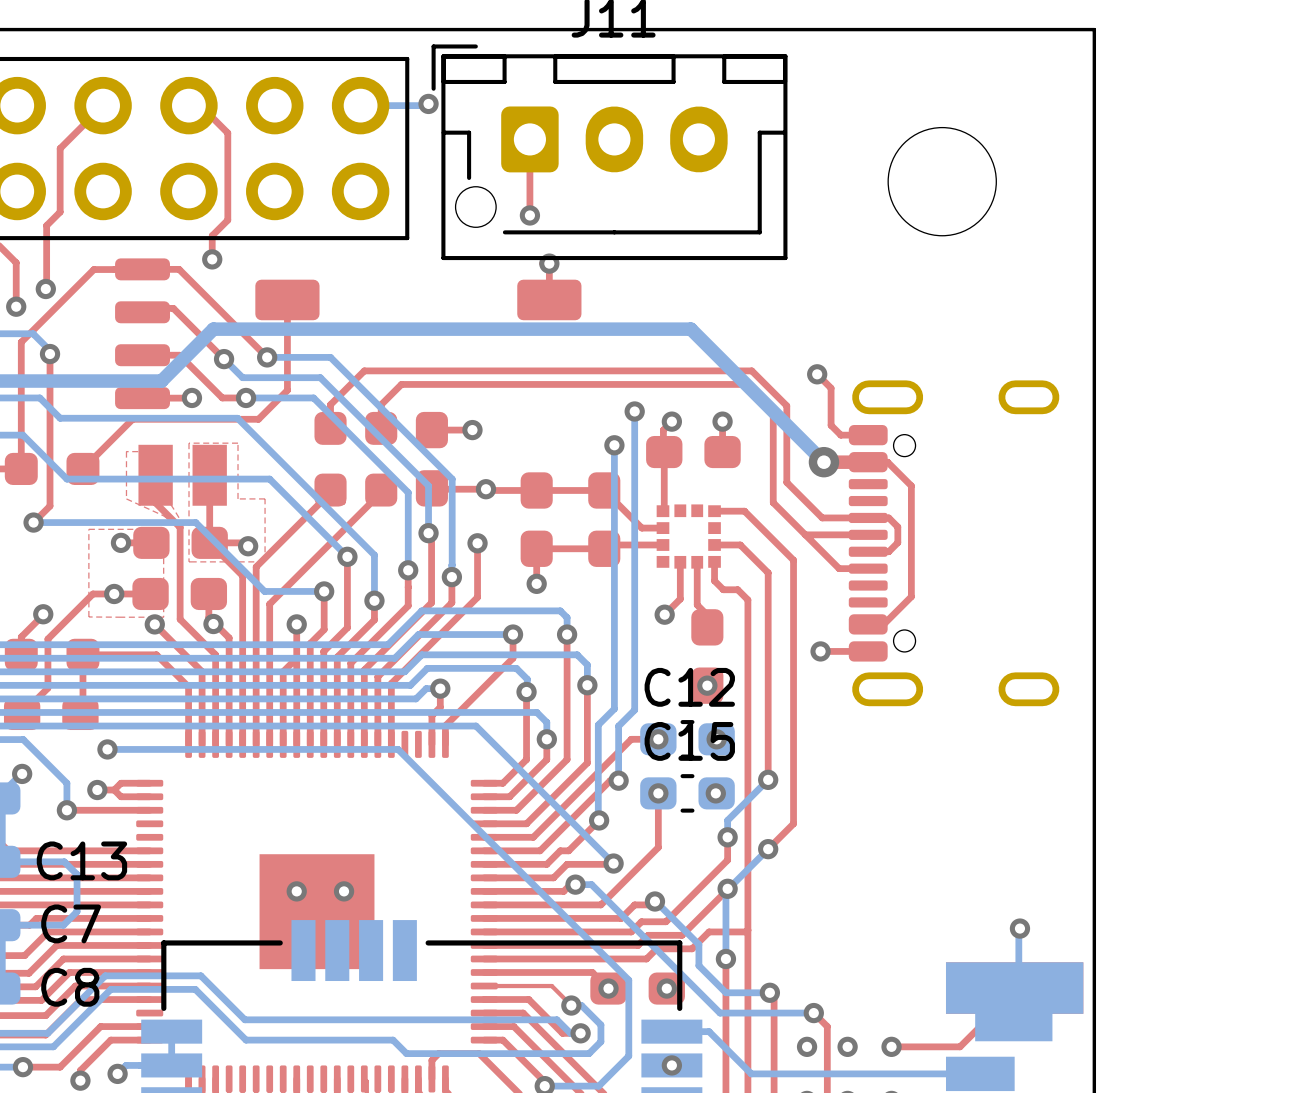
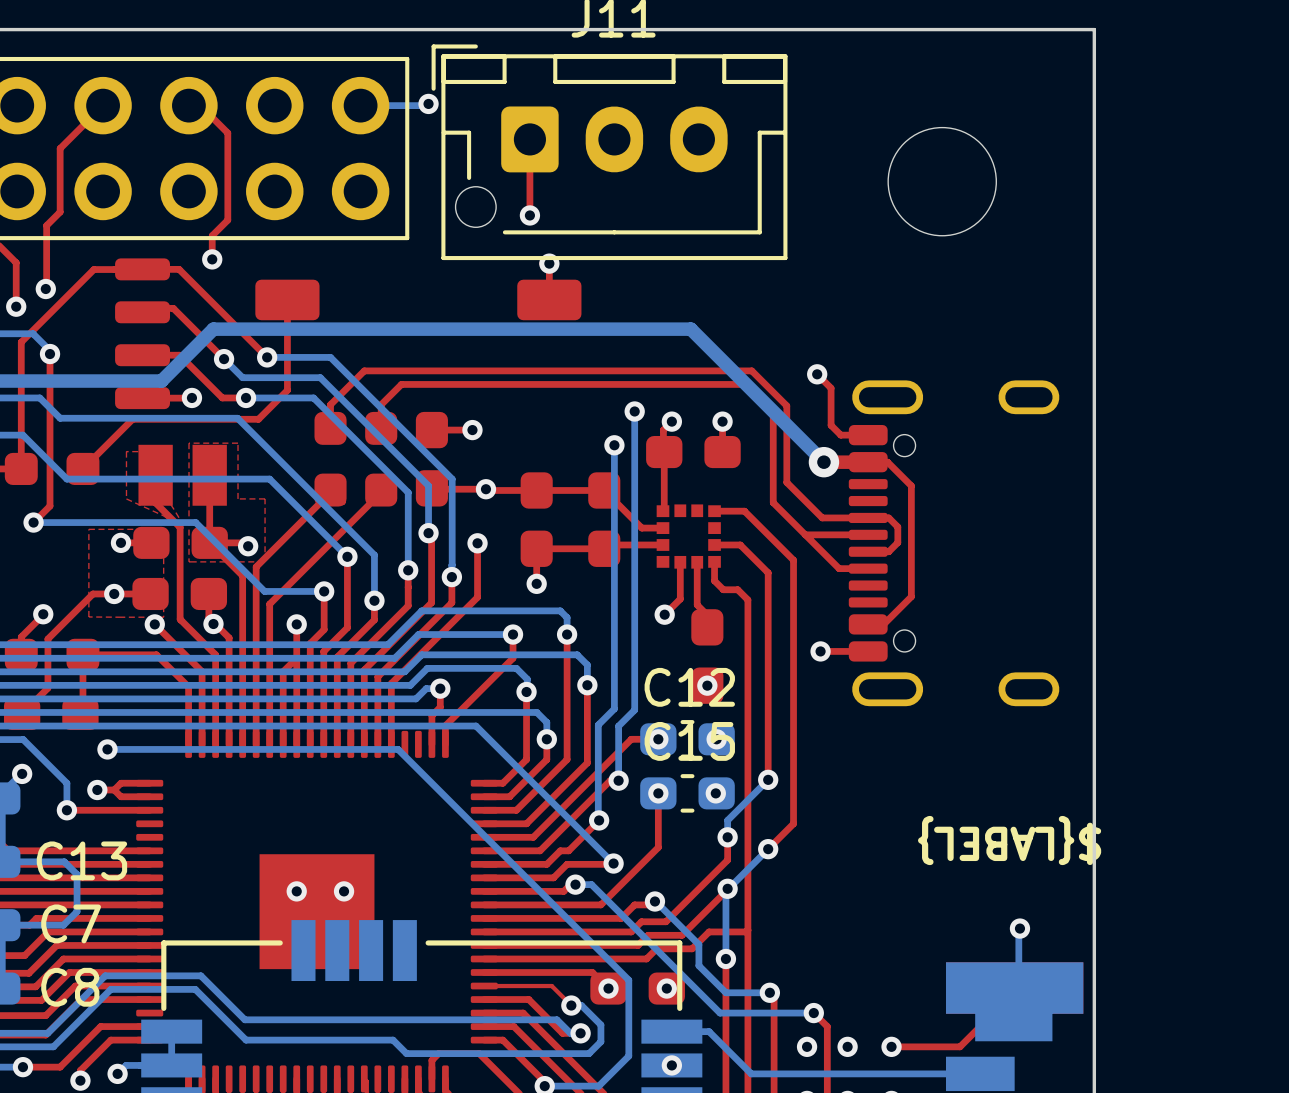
part text: none -> ${LABEL} (1009, 840)

